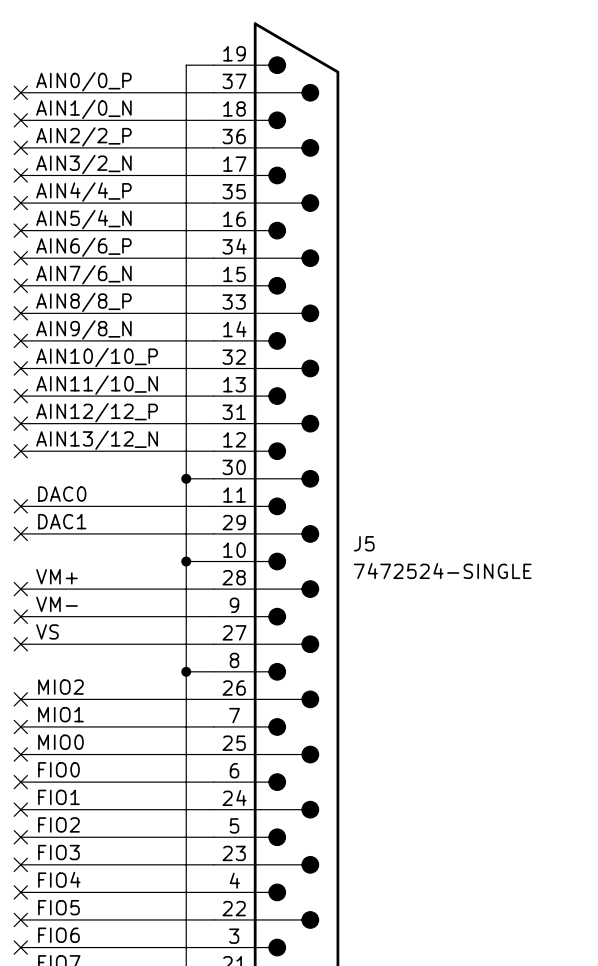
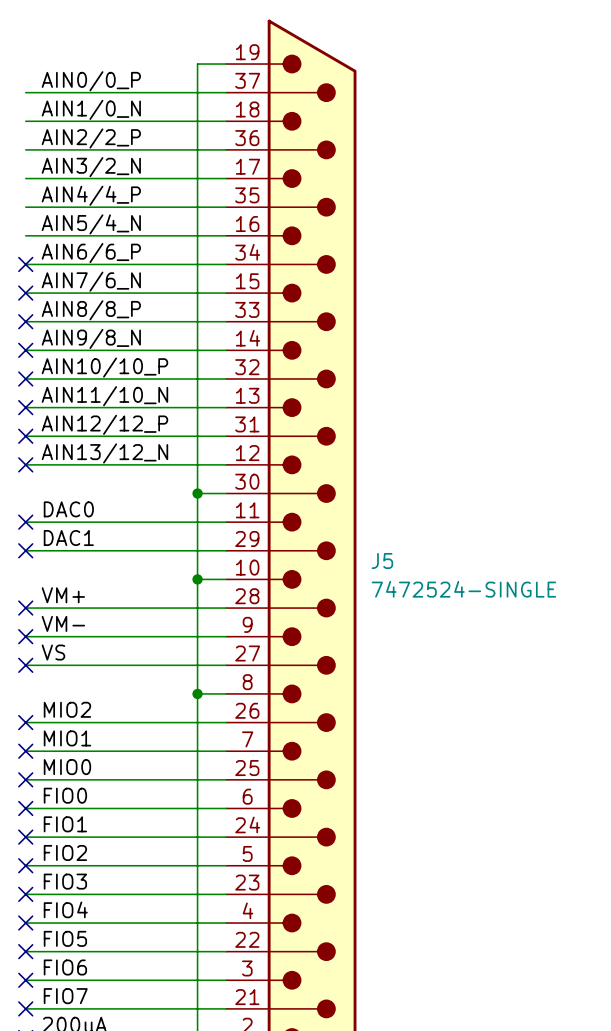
no-connect mark: (20, 92) -> none
no-connect mark: (20, 120) -> none
no-connect mark: (20, 147) -> none
no-connect mark: (20, 175) -> none
no-connect mark: (20, 203) -> none
no-connect mark: (20, 230) -> none

